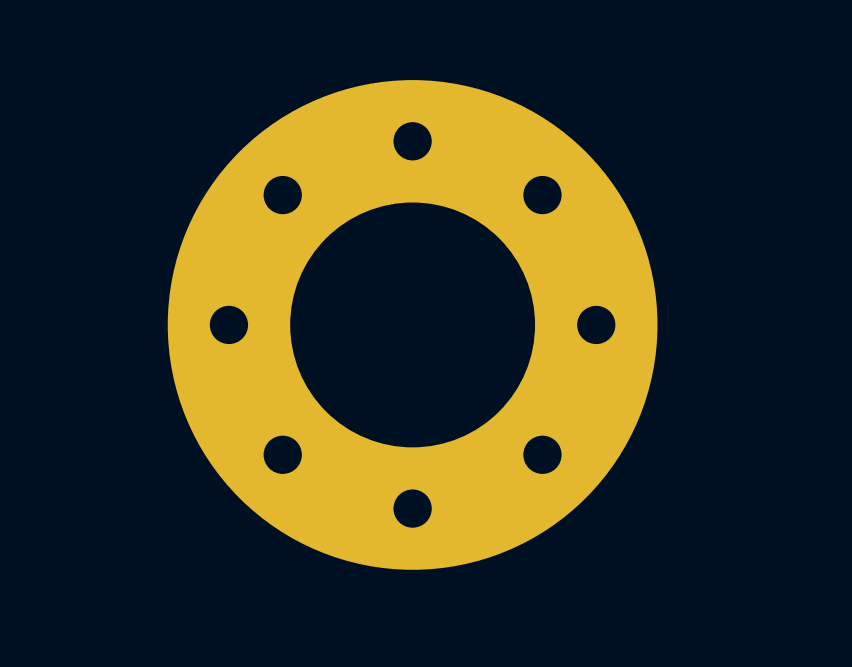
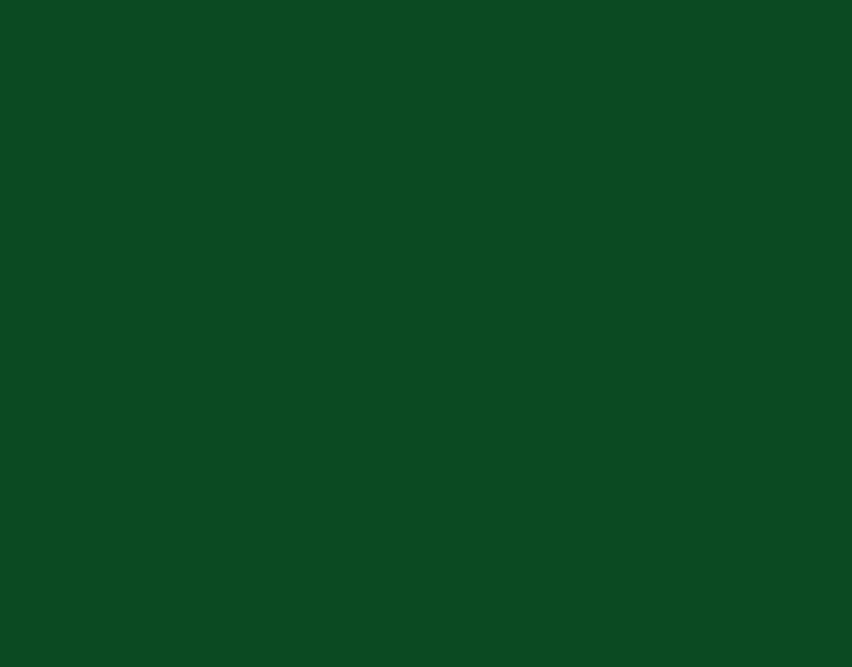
part: (412, 324) -> none

